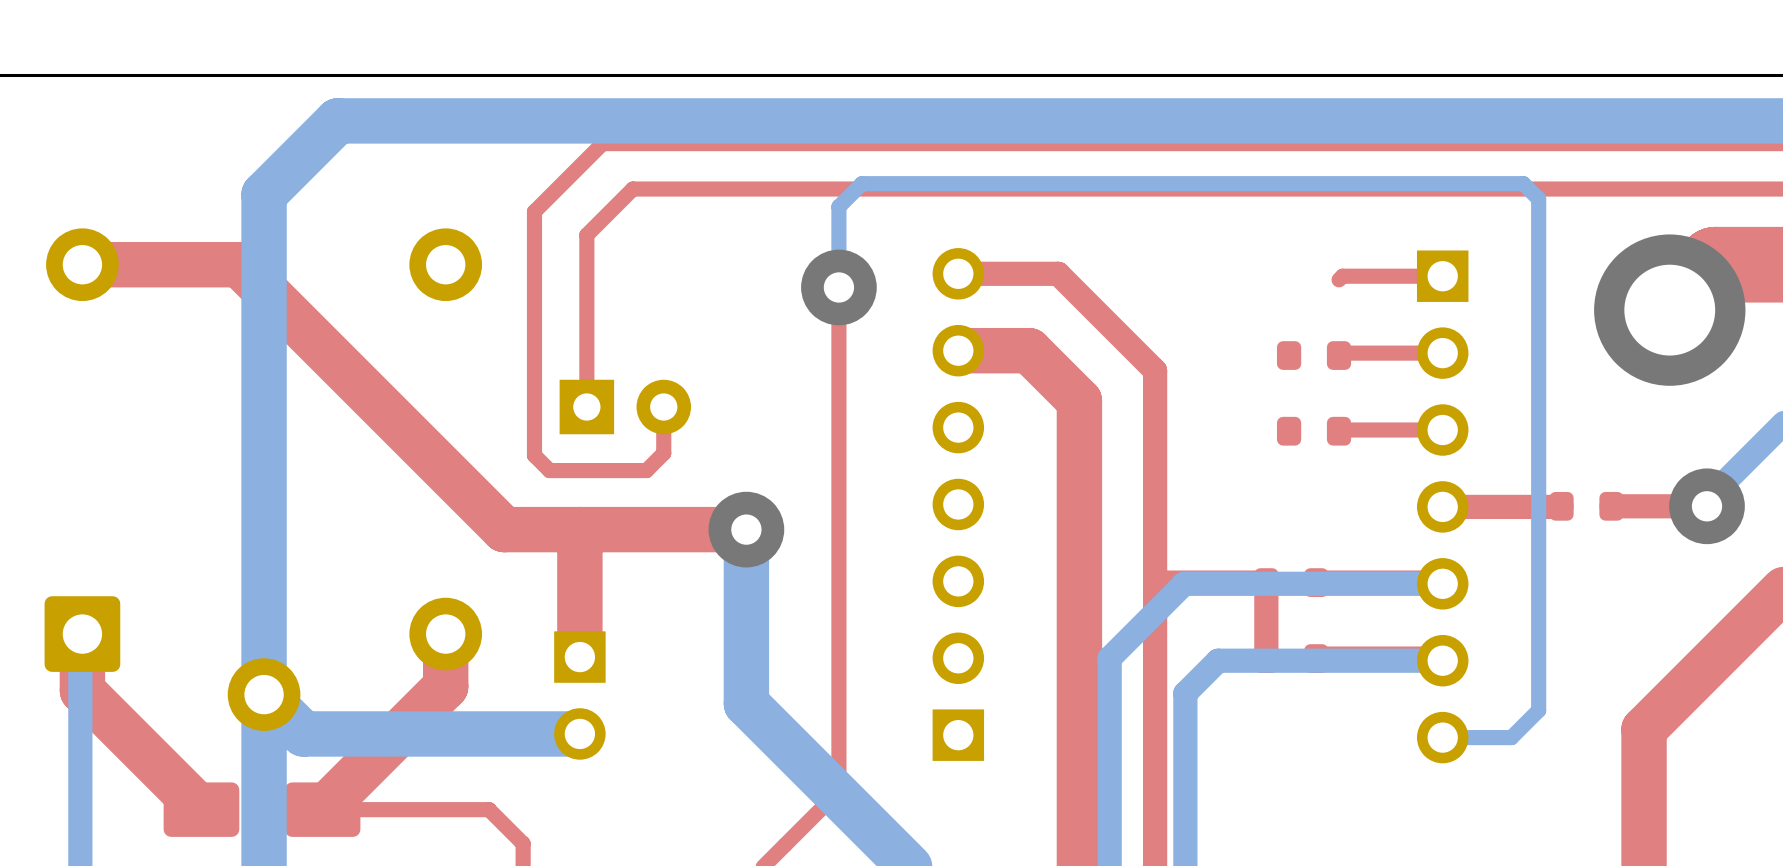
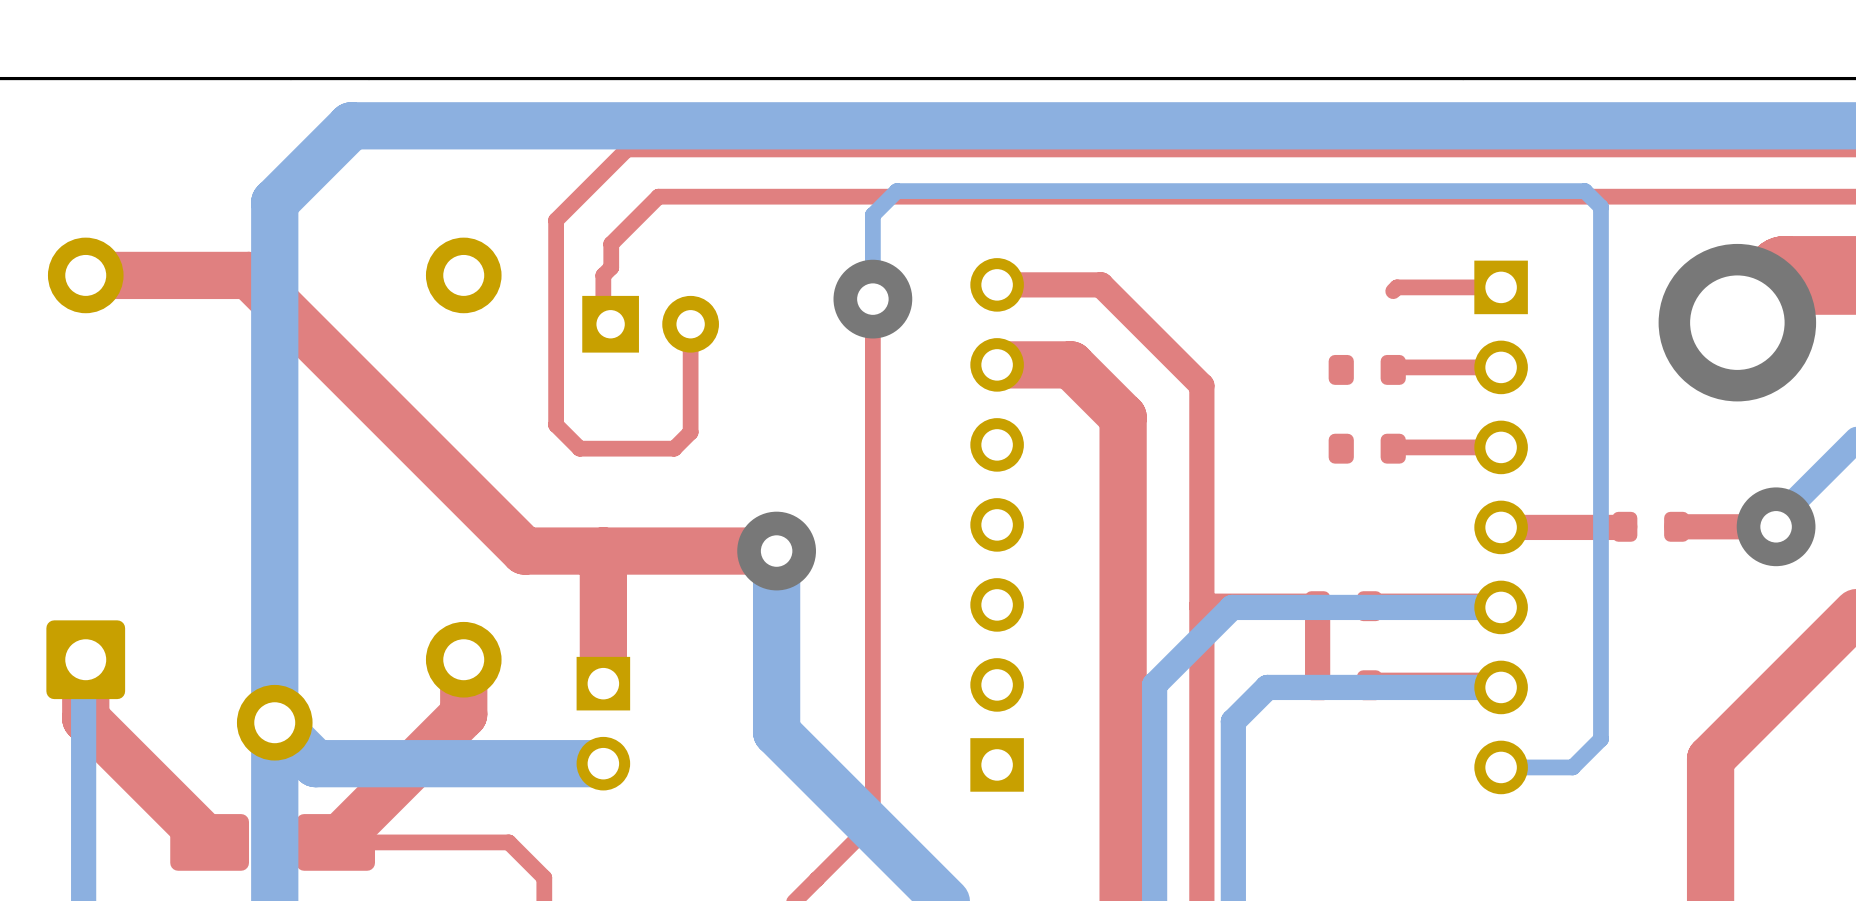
top track: (587, 234) (586, 407) -> (611, 243) (611, 267) (603, 275) (603, 324)
top track: none -> (690, 324) (690, 423)
part position: (625, 407) -> (650, 324)
top track: (534, 408) (534, 455) (549, 470) (646, 470) (663, 453) (663, 415) -> (556, 425) (579, 448) (674, 448) (690, 432)

